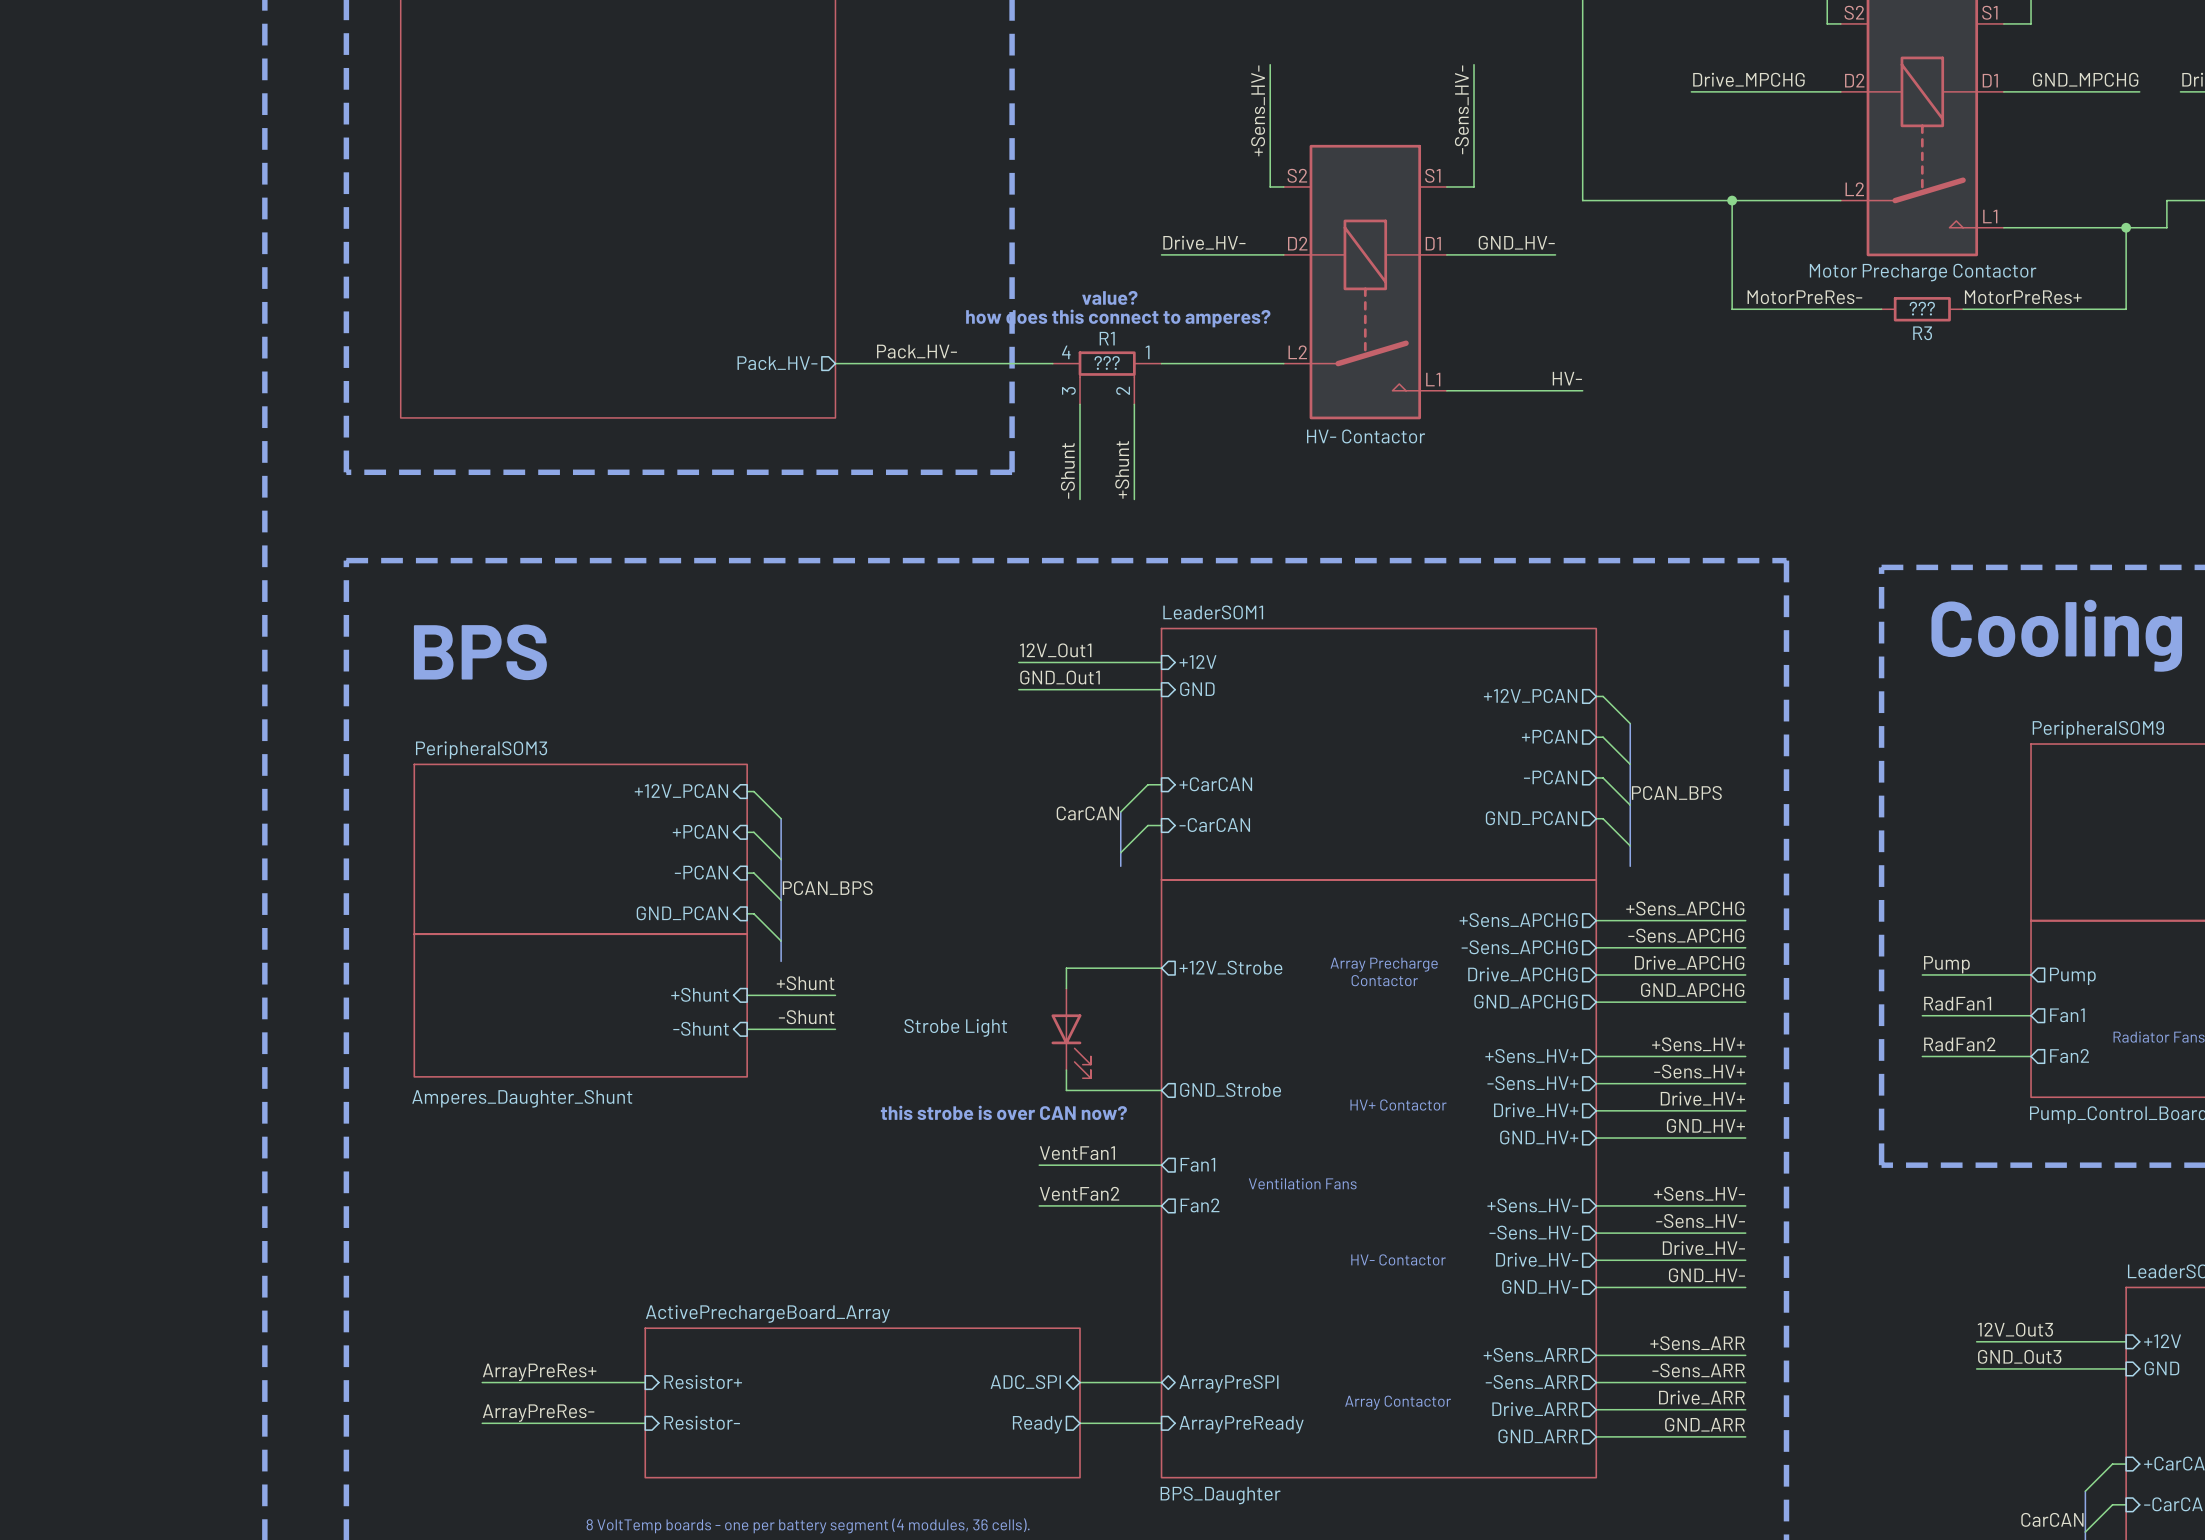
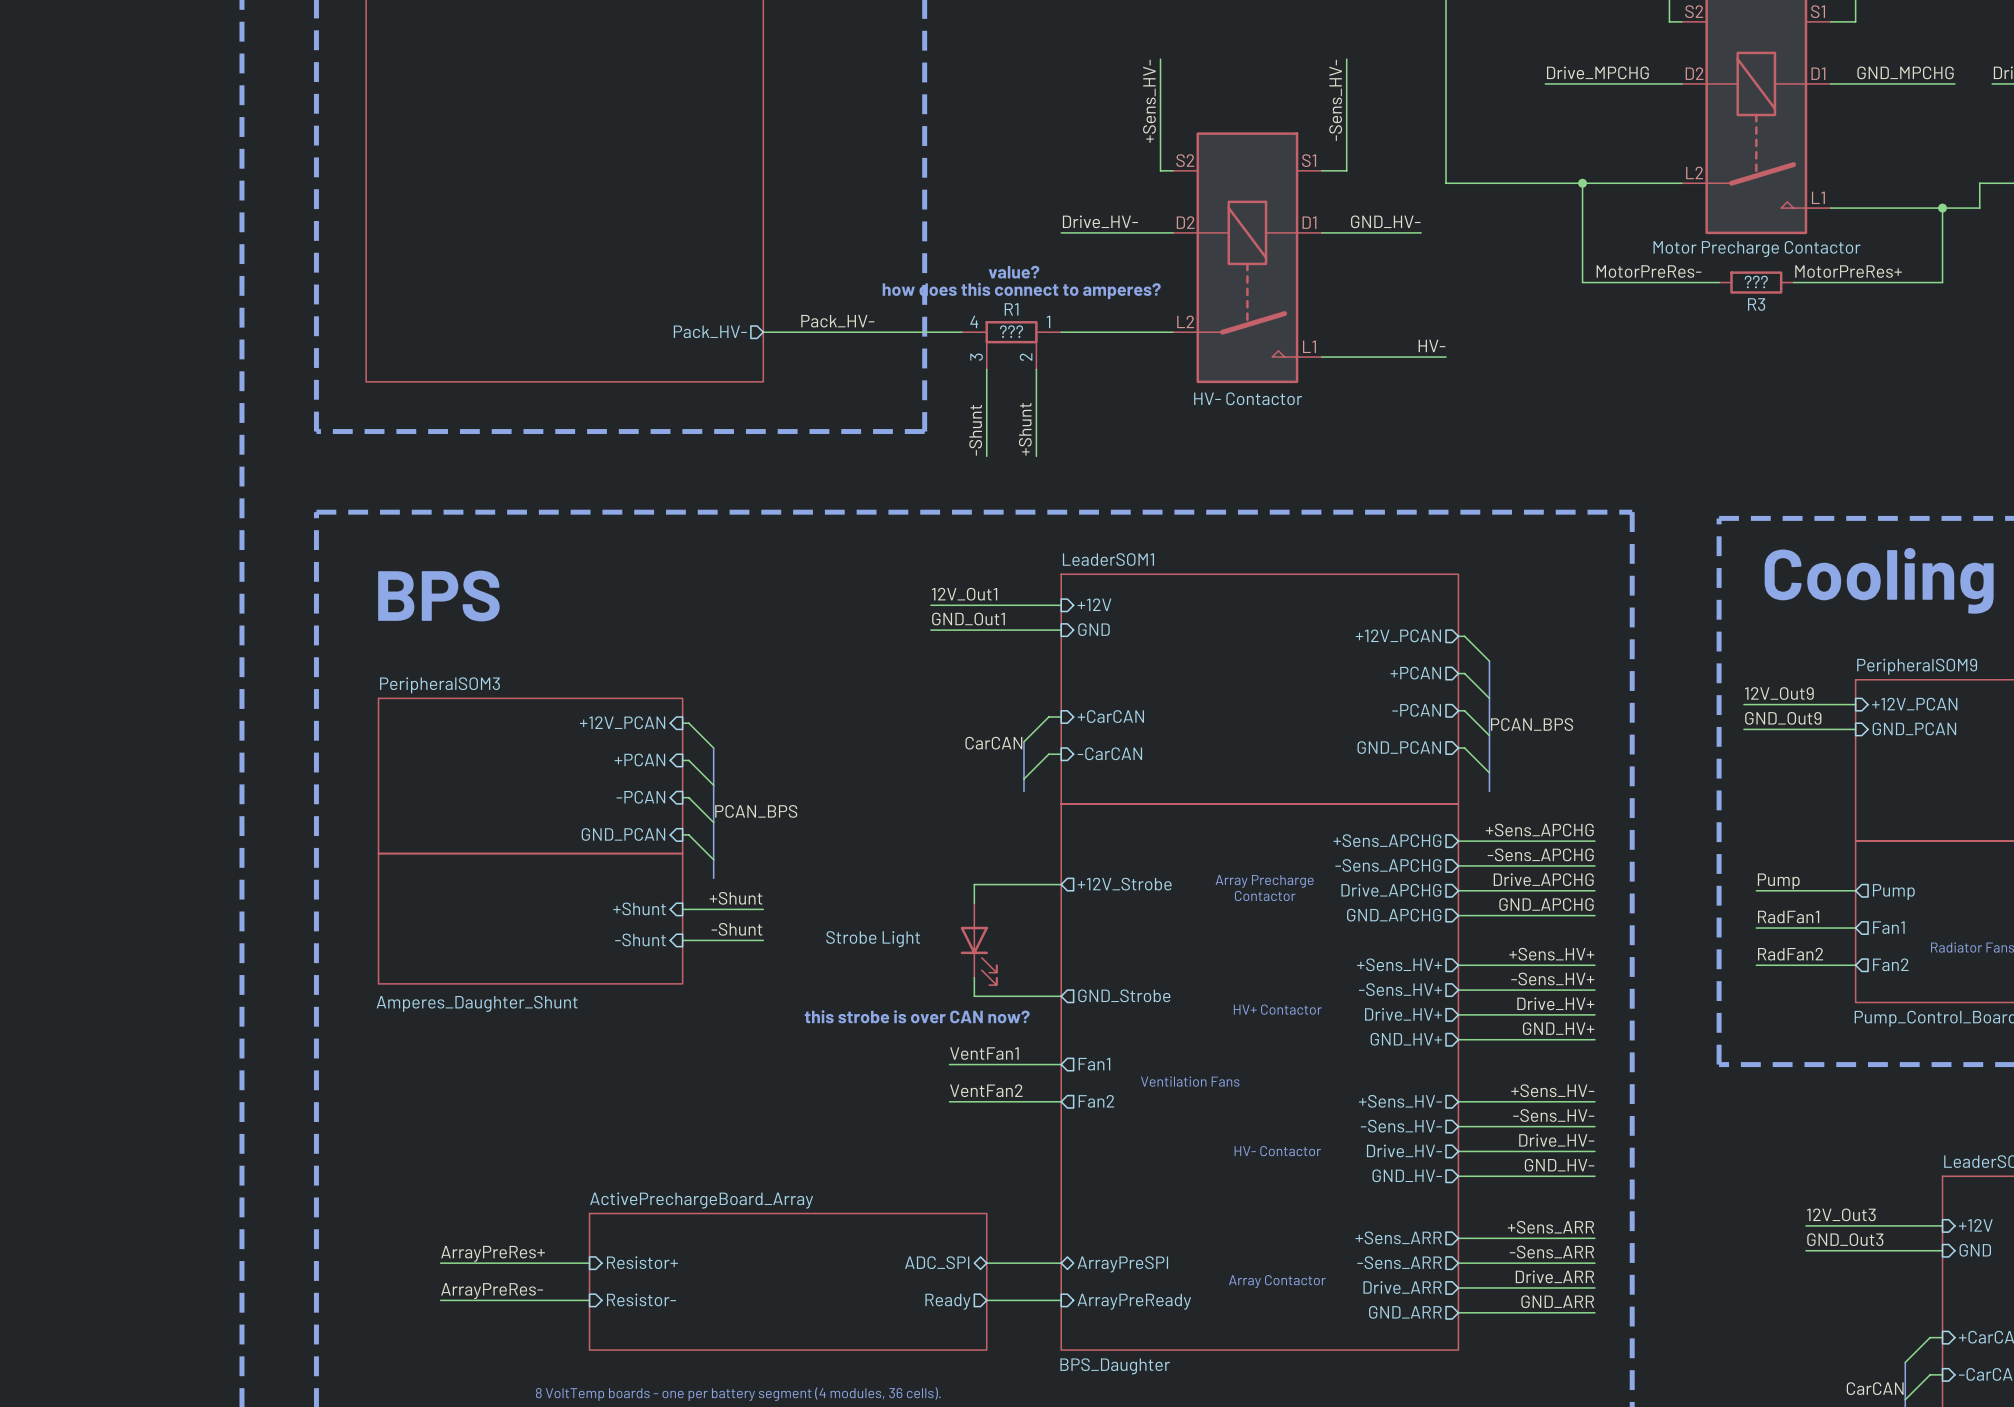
label: none -> 12V_Out9 (1779, 693)
sheet pin: none -> +12V_PCAN (1914, 704)
wire: none -> (1743, 704) (1855, 704)
label: none -> GND_Out9 (1783, 718)
sheet pin: none -> GND_PCAN (1914, 728)
wire: none -> (1743, 729) (1855, 729)

